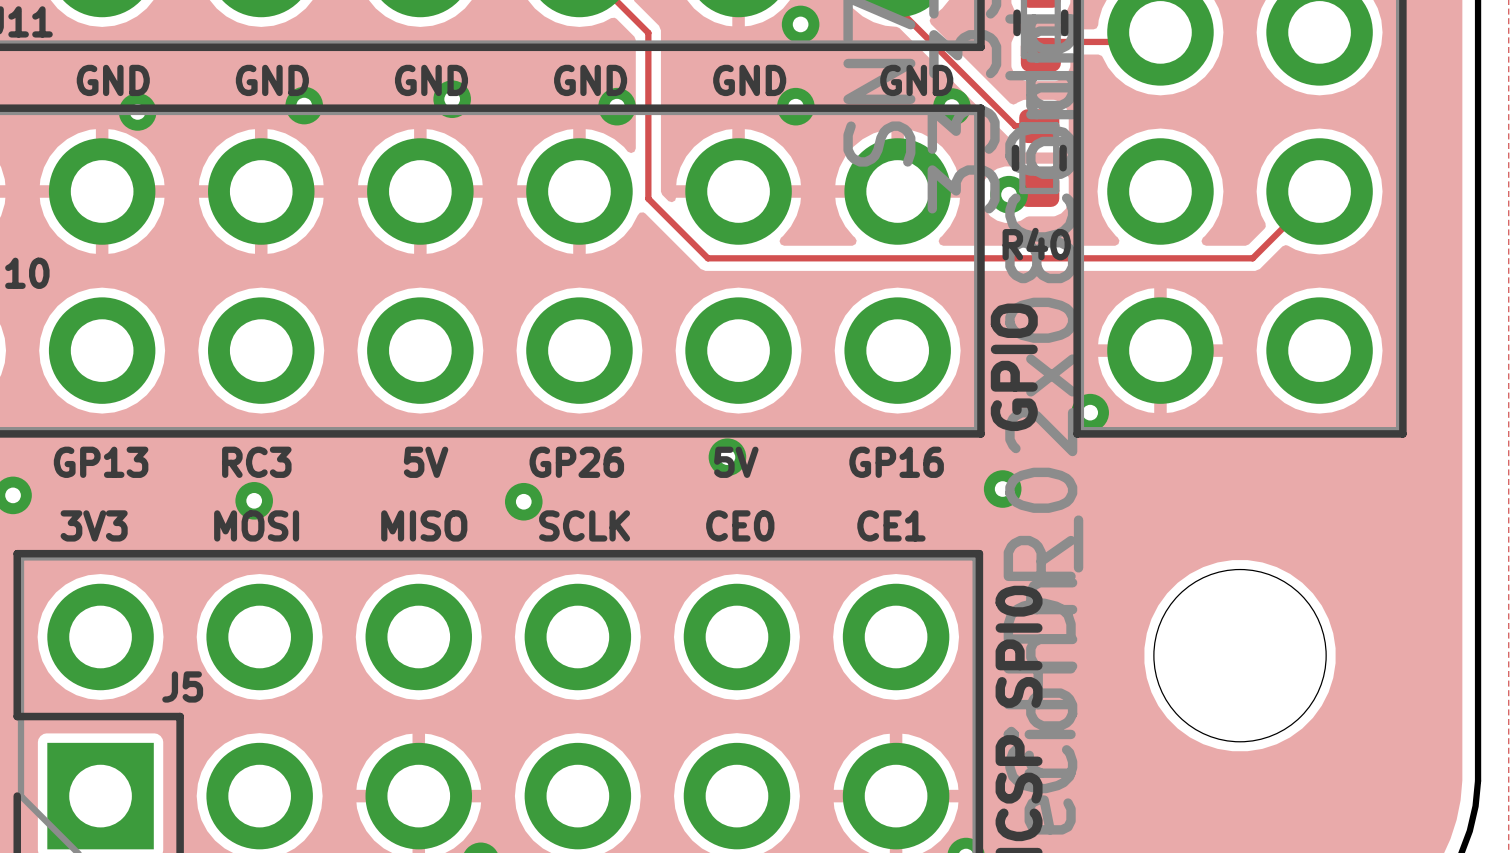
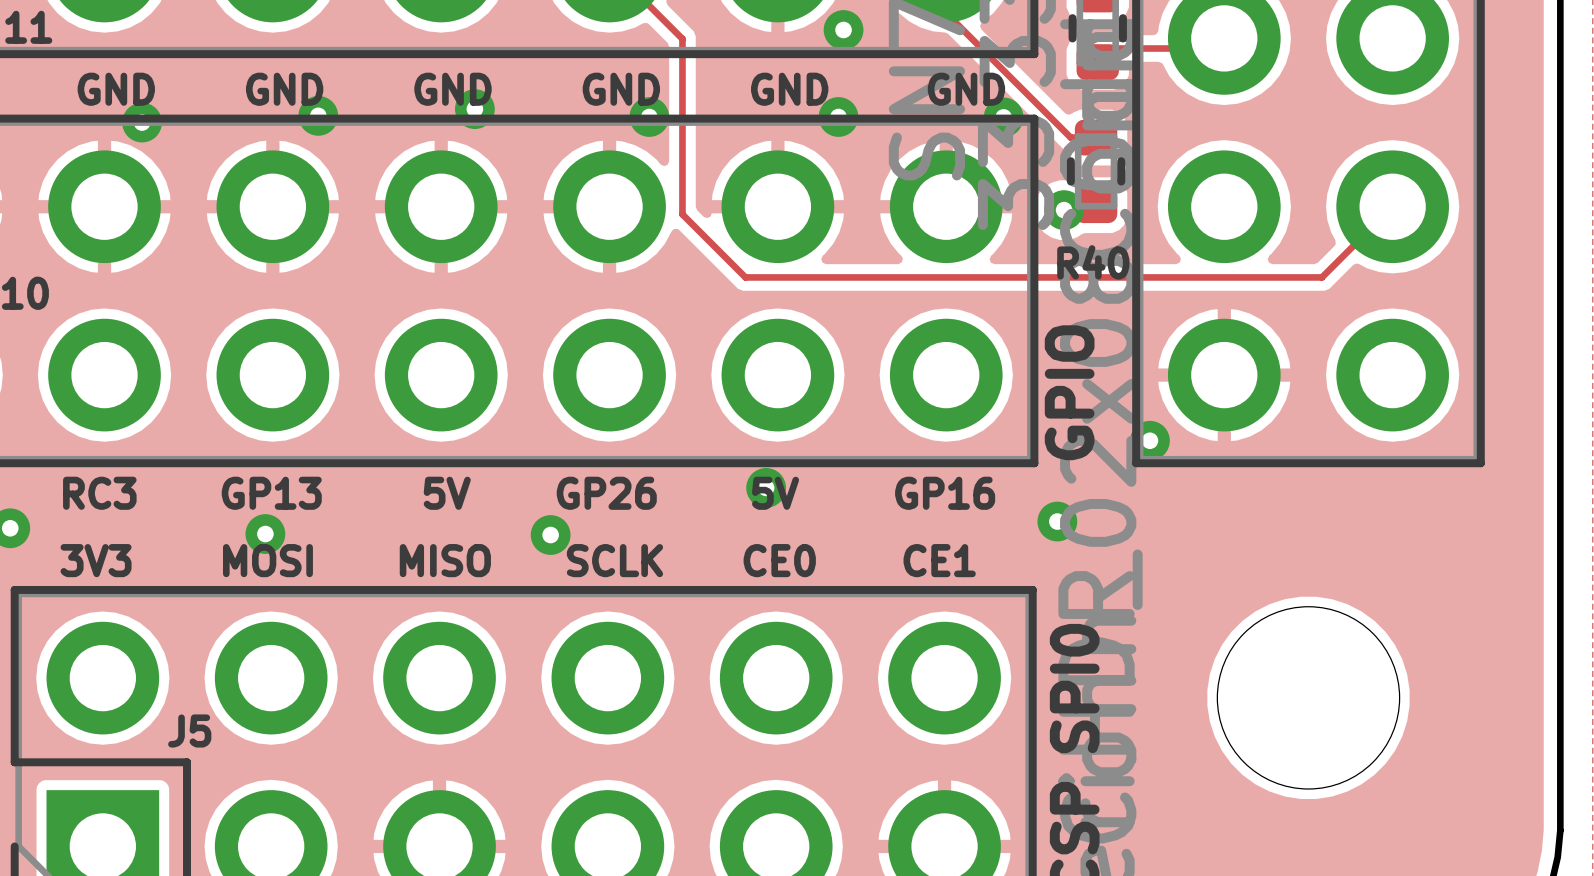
text position: GP13 (101, 462) -> GP13 (271, 493)
text position: RC3 (256, 462) -> RC3 (99, 493)

